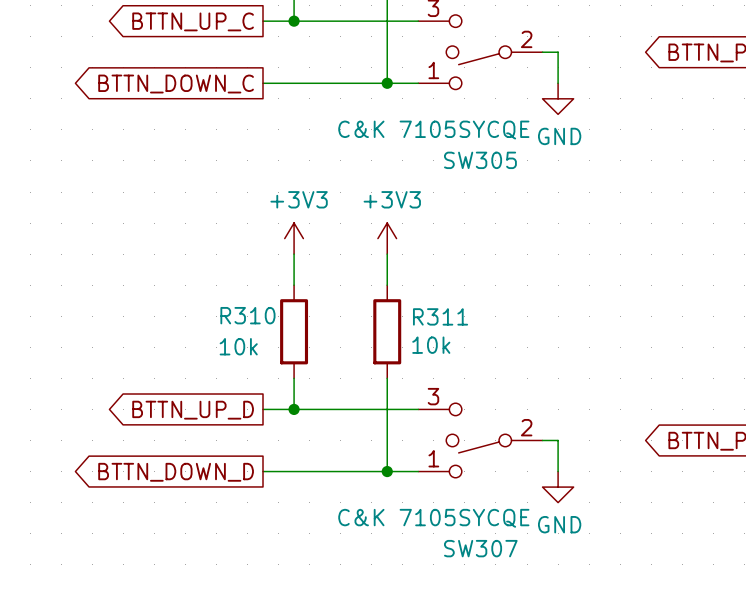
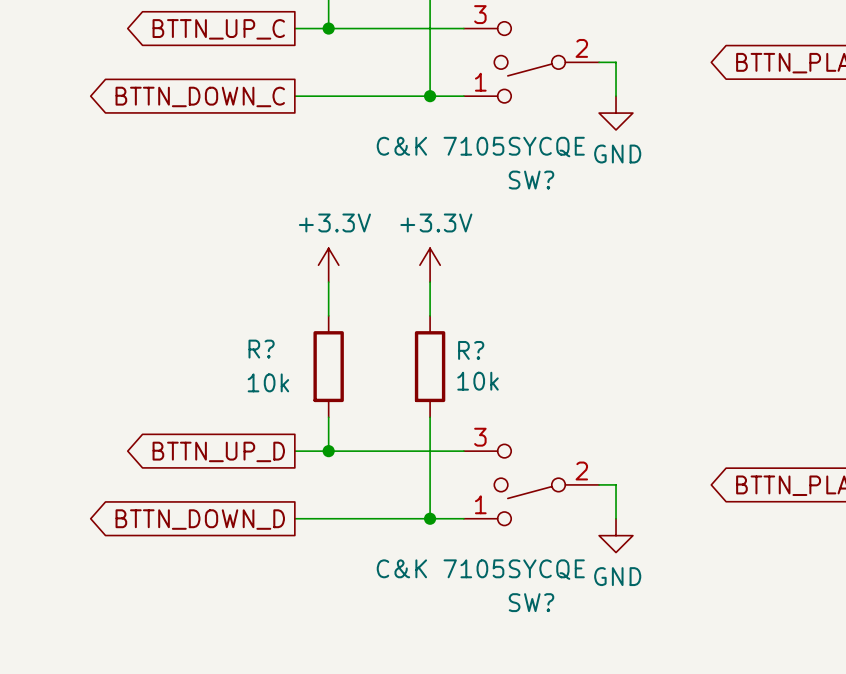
SW305 name: SW305 (480, 160) -> SW? (531, 180)
power symbol: +3V3 (294, 238) -> +3.3V (328, 265)
power symbol: +3V3 (387, 238) -> +3.3V (430, 265)
R310 name: R310 (247, 315) -> R? (261, 349)
R311 name: R311 (440, 316) -> R? (471, 350)
SW307 name: SW307 (480, 548) -> SW? (531, 602)

